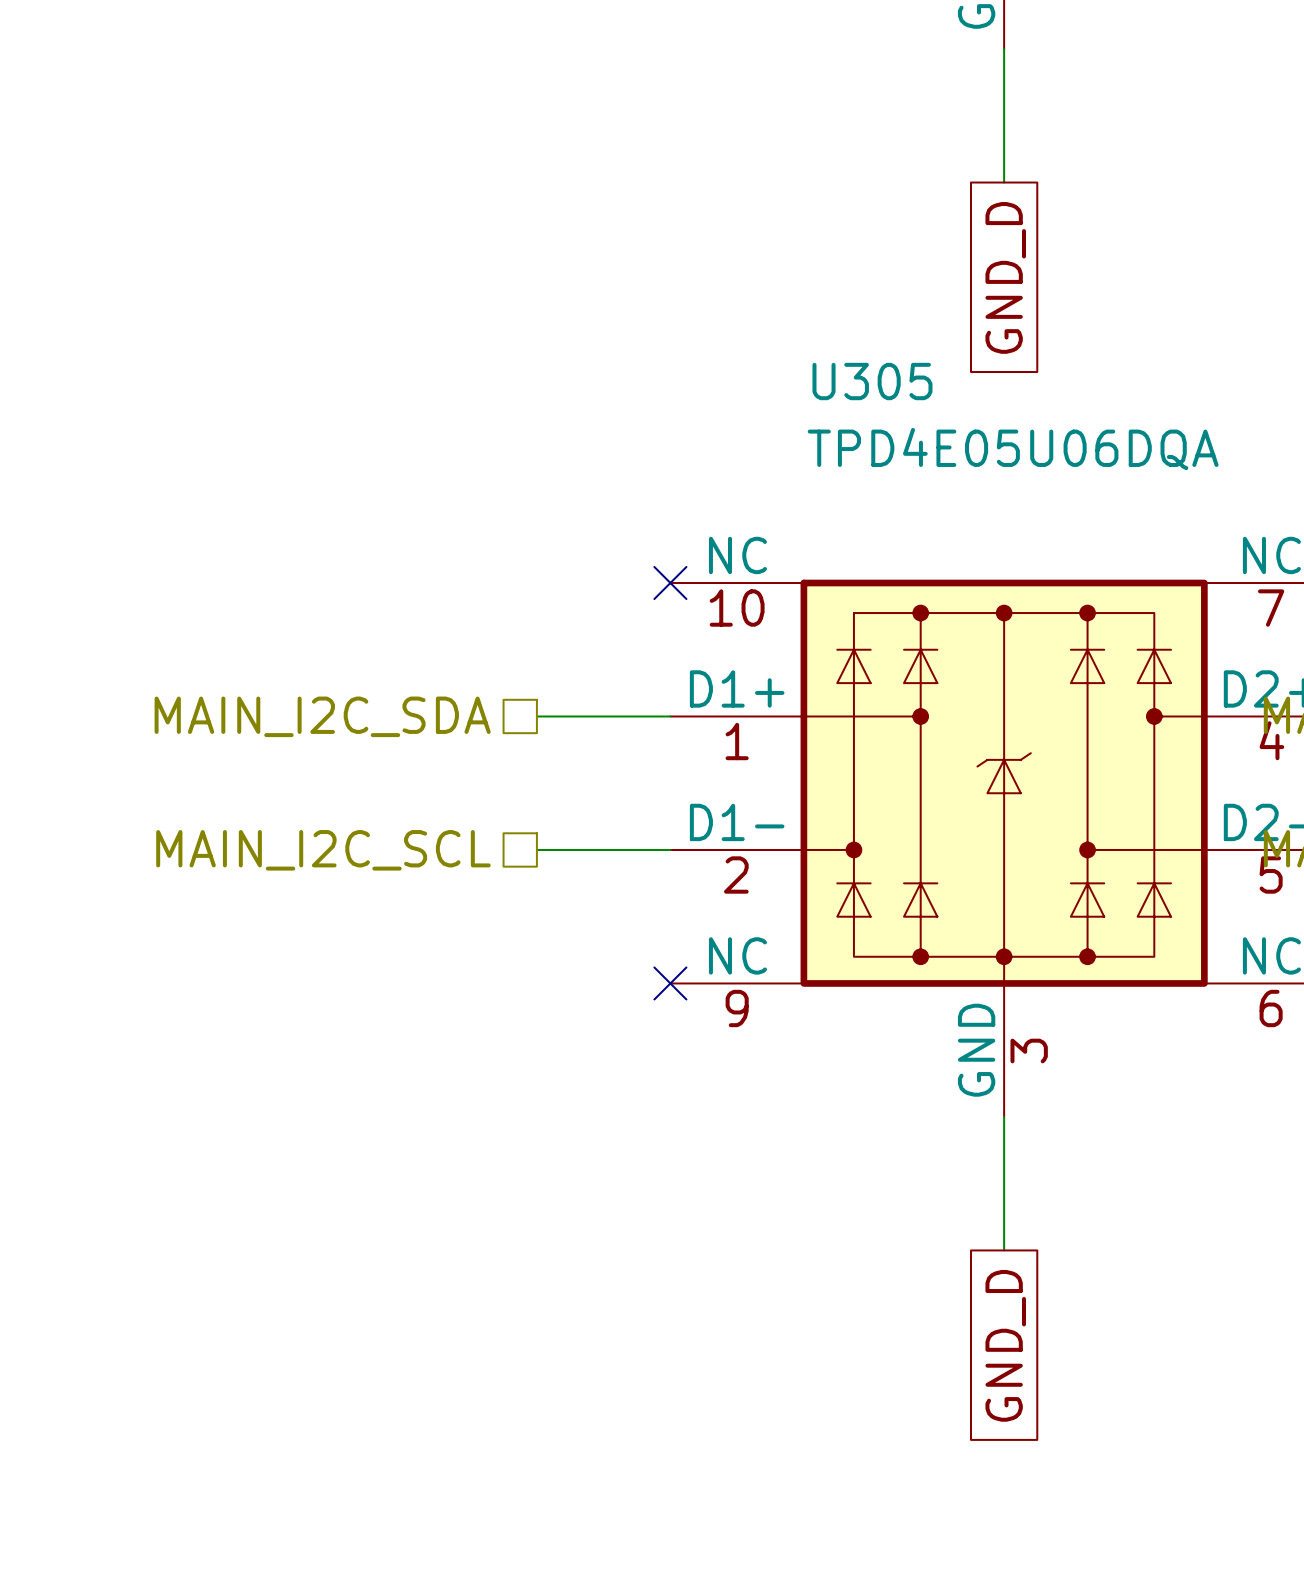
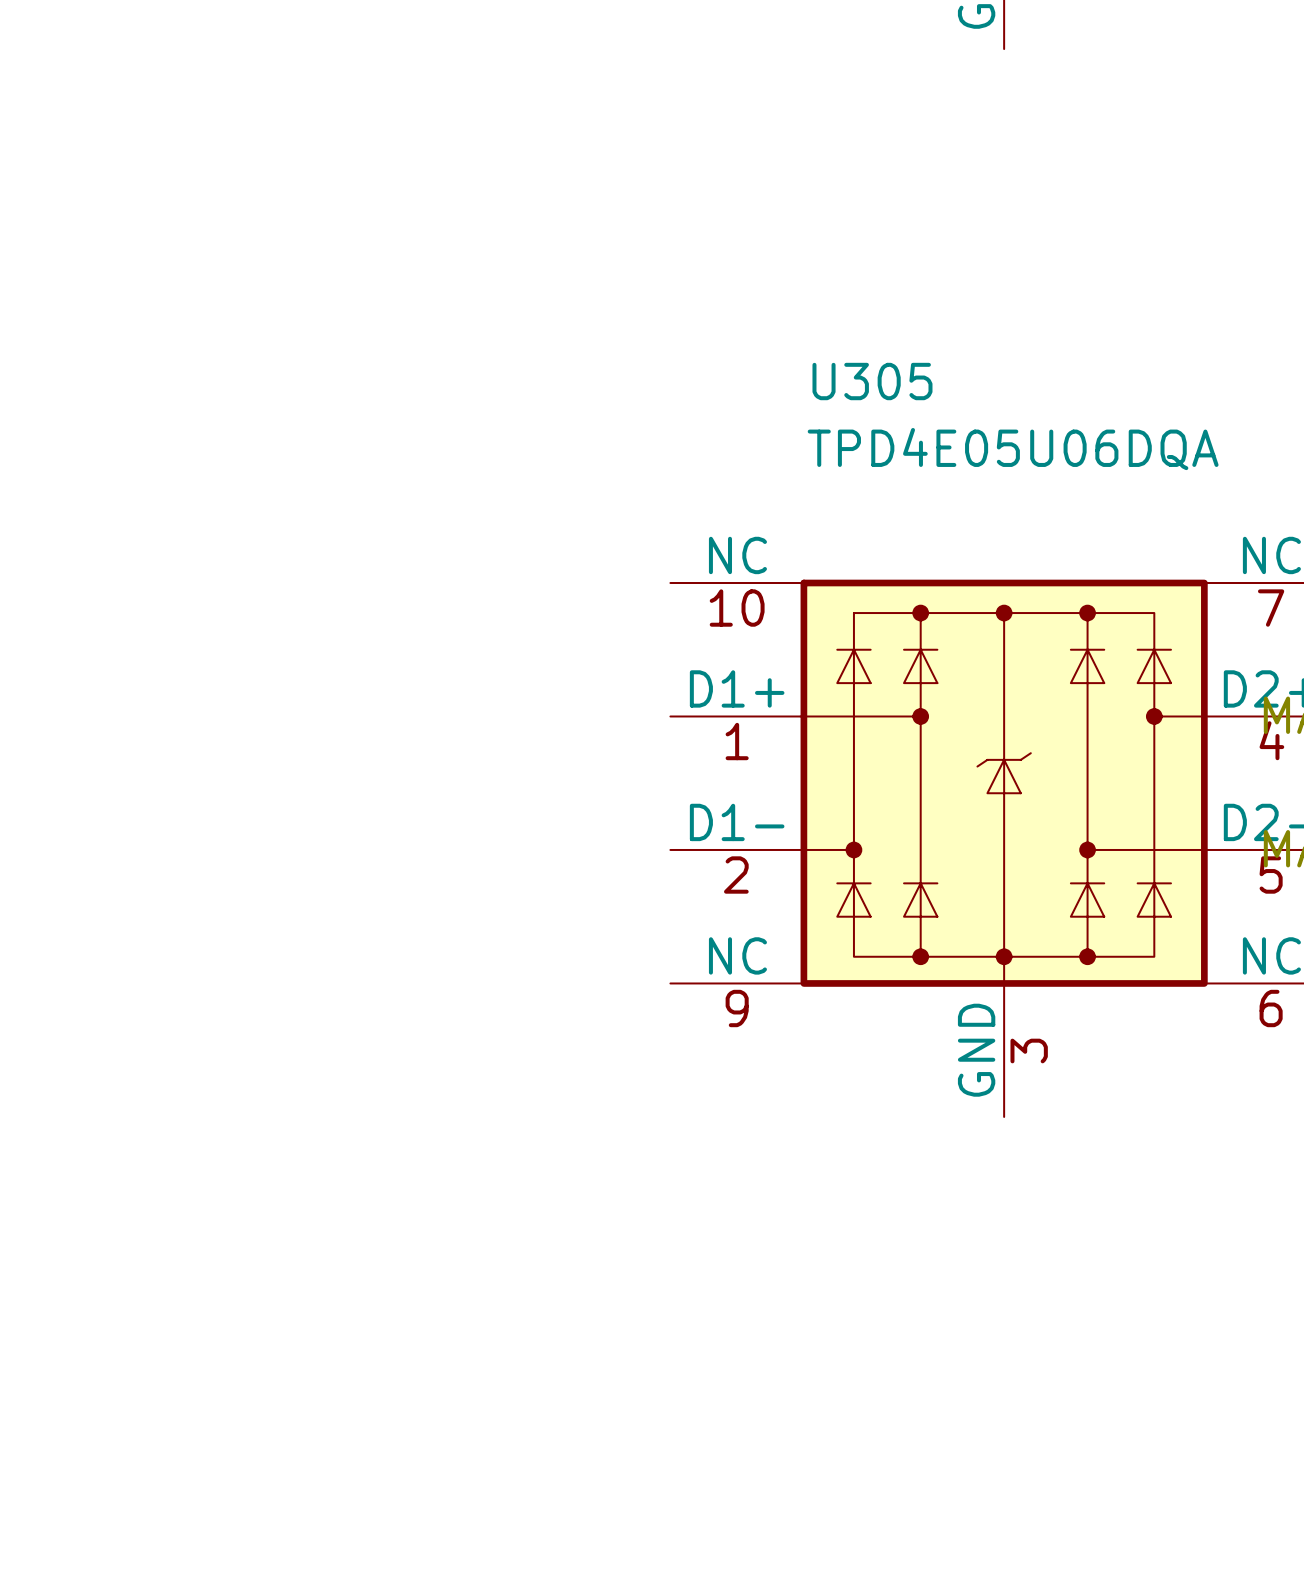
wire: (1004, 49) (1004, 182) -> none
global label: GND_D (1005, 277) -> none
no-connect mark: (670, 582) -> none
hierarchical label: MAIN_I2C_SDA (322, 716) -> none
wire: (536, 716) (670, 716) -> none
wire: (536, 849) (670, 849) -> none
hierarchical label: MAIN_I2C_SCL (323, 850) -> none
no-connect mark: (670, 983) -> none
wire: (1004, 1116) (1004, 1250) -> none
global label: GND_D (1005, 1345) -> none

